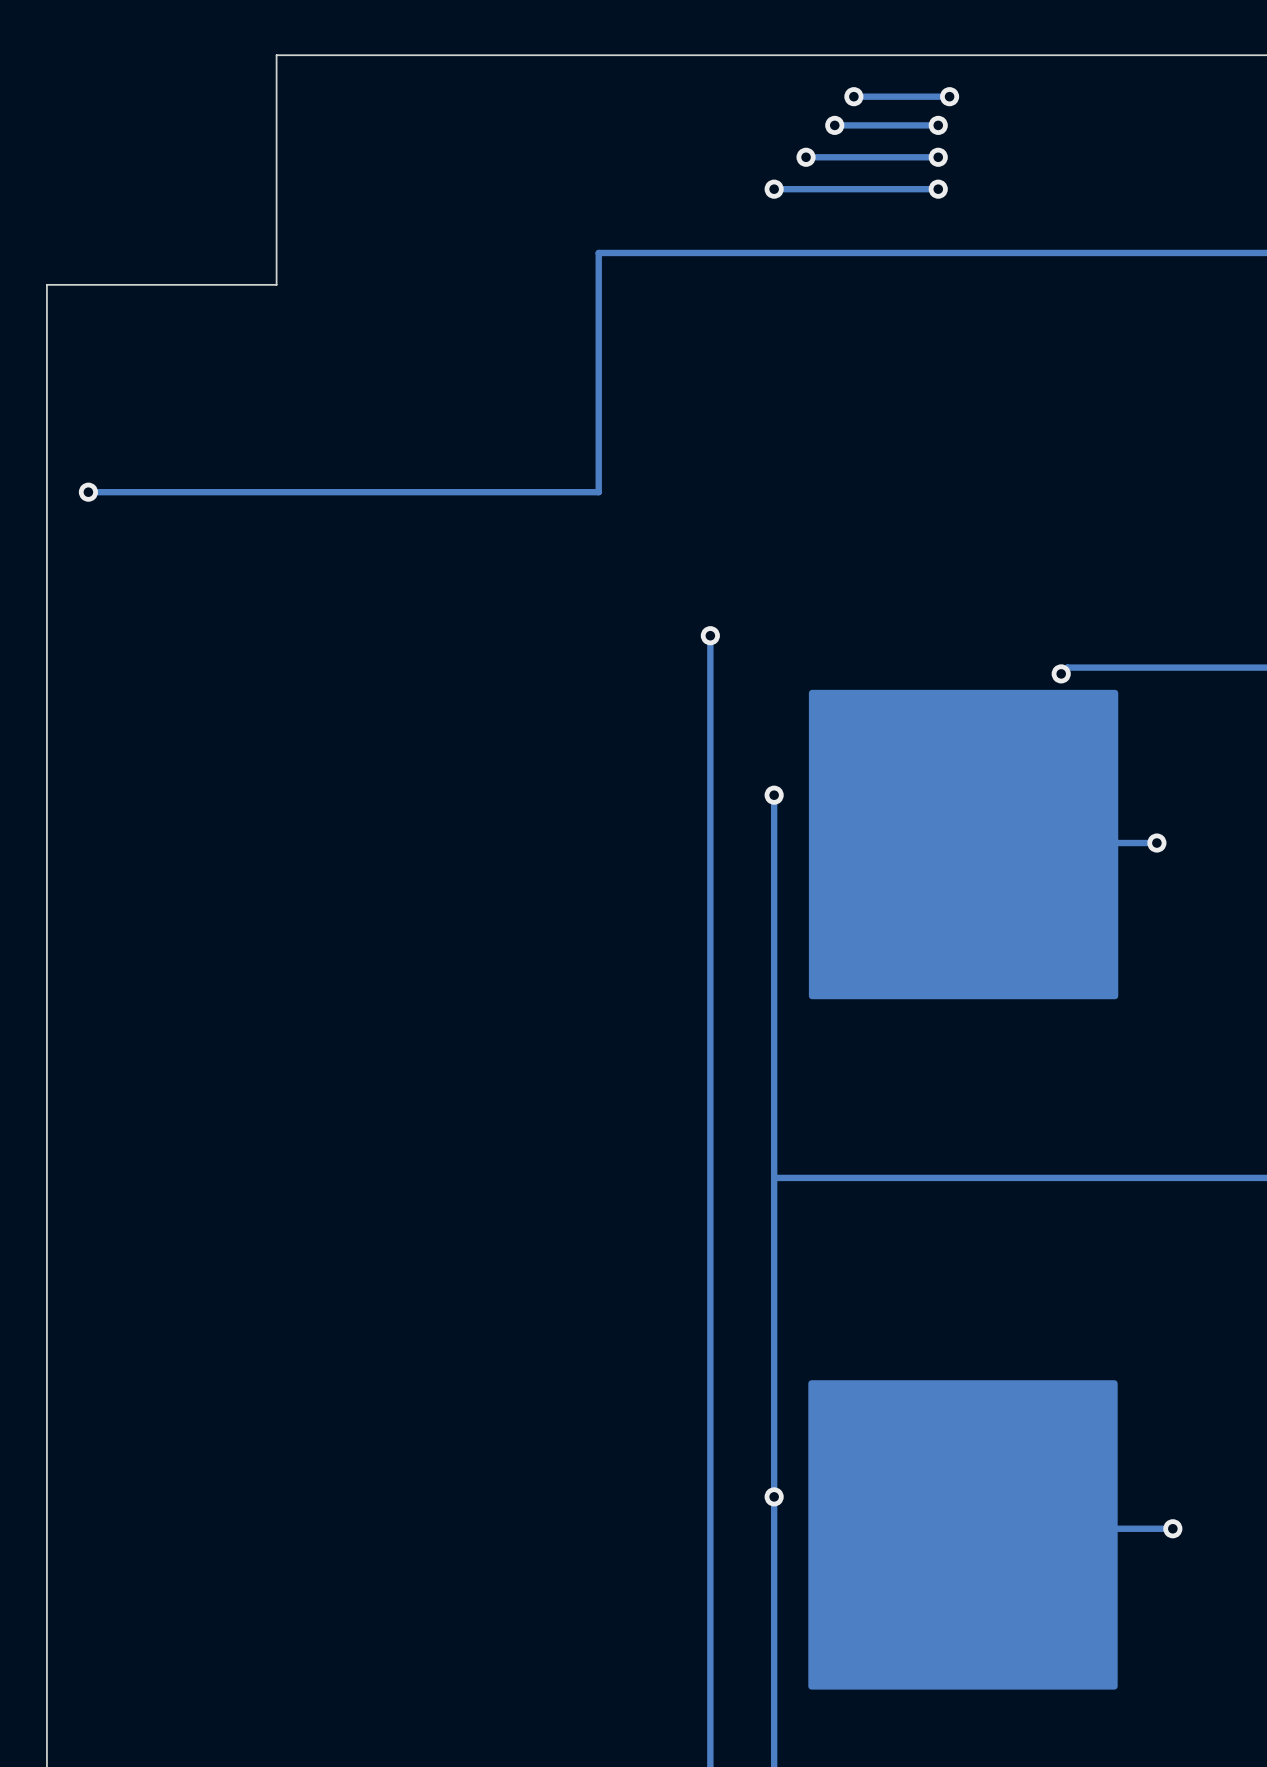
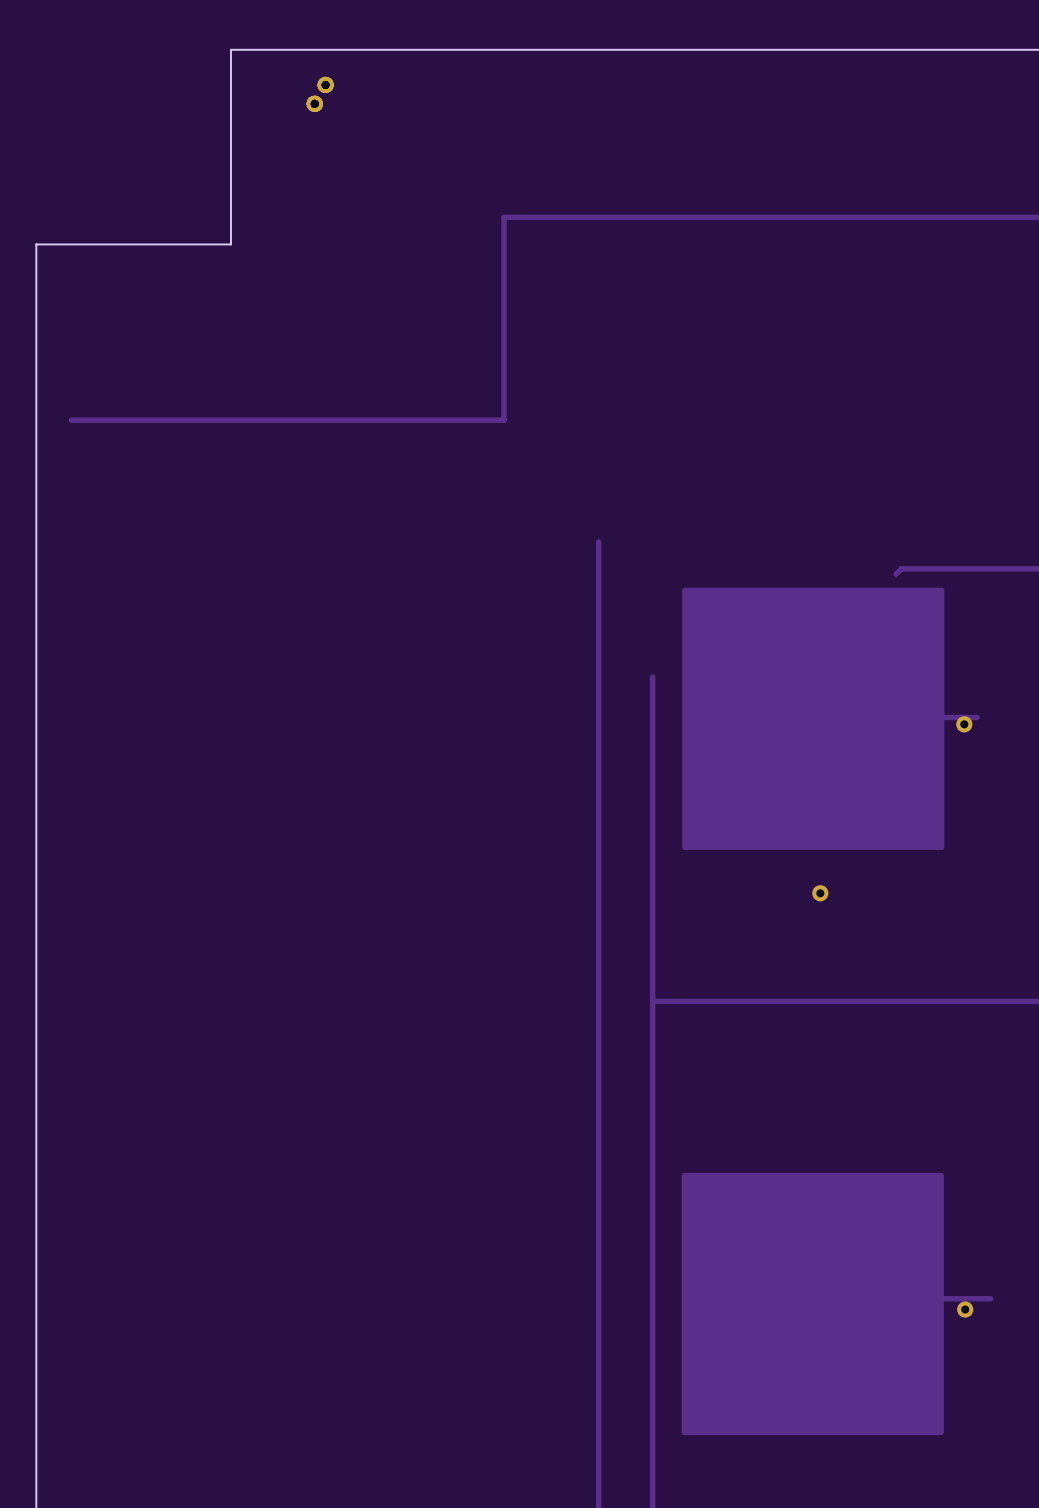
via: none -> (325, 84)
via: (853, 96) -> none
track: (949, 96) (853, 96) -> none
via: (949, 96) -> none
via: none -> (314, 103)
via: (834, 125) -> none
track: (938, 125) (834, 125) -> none
via: (938, 125) -> none
via: (806, 157) -> none
track: (938, 157) (806, 157) -> none
via: (938, 157) -> none
via: (774, 189) -> none
track: (938, 189) (774, 189) -> none
via: (938, 189) -> none
via: (88, 492) -> none
via: (710, 635) -> none
via: (1061, 673) -> none
via: (774, 795) -> none
via position: (1156, 843) -> (964, 724)
via: none -> (820, 893)
via: (774, 1496) -> none
via position: (1172, 1528) -> (965, 1309)

